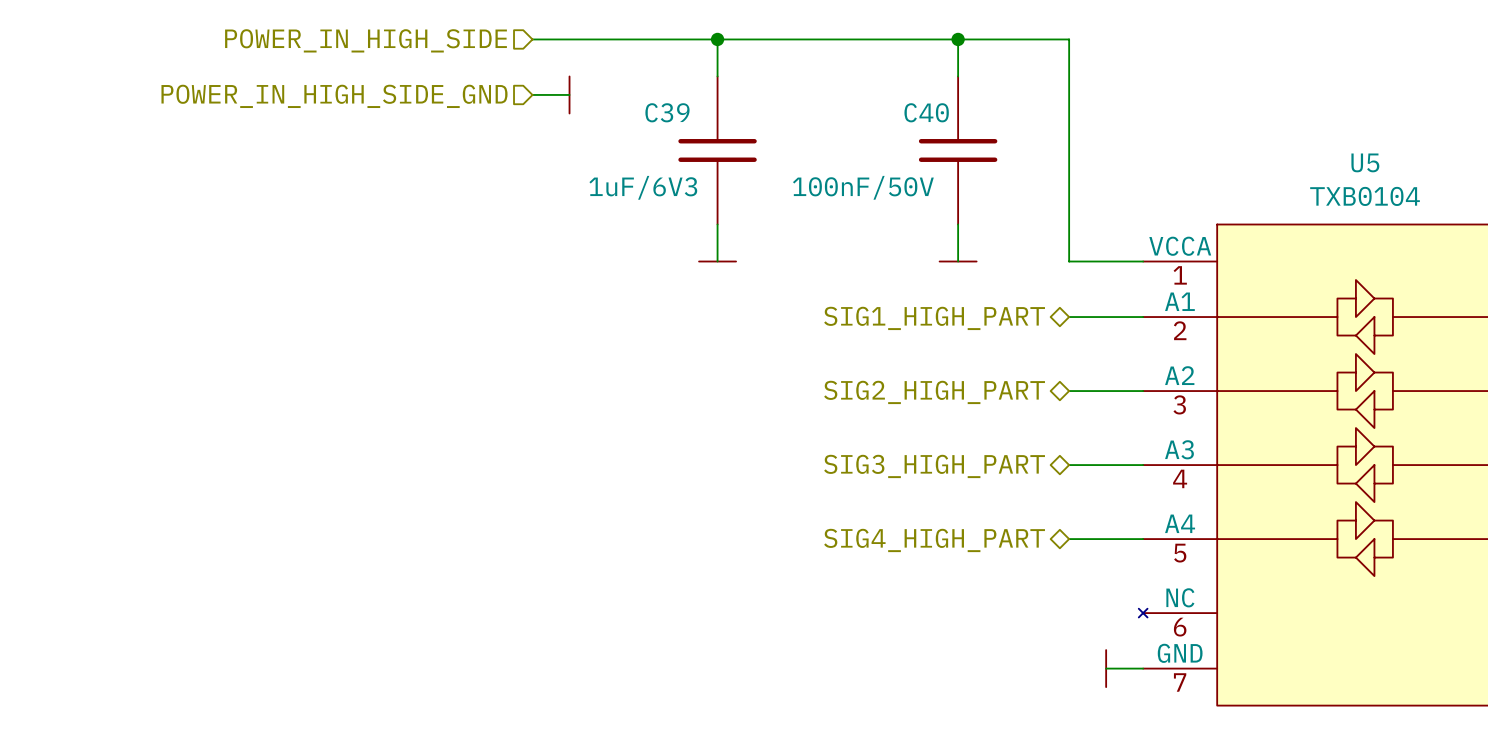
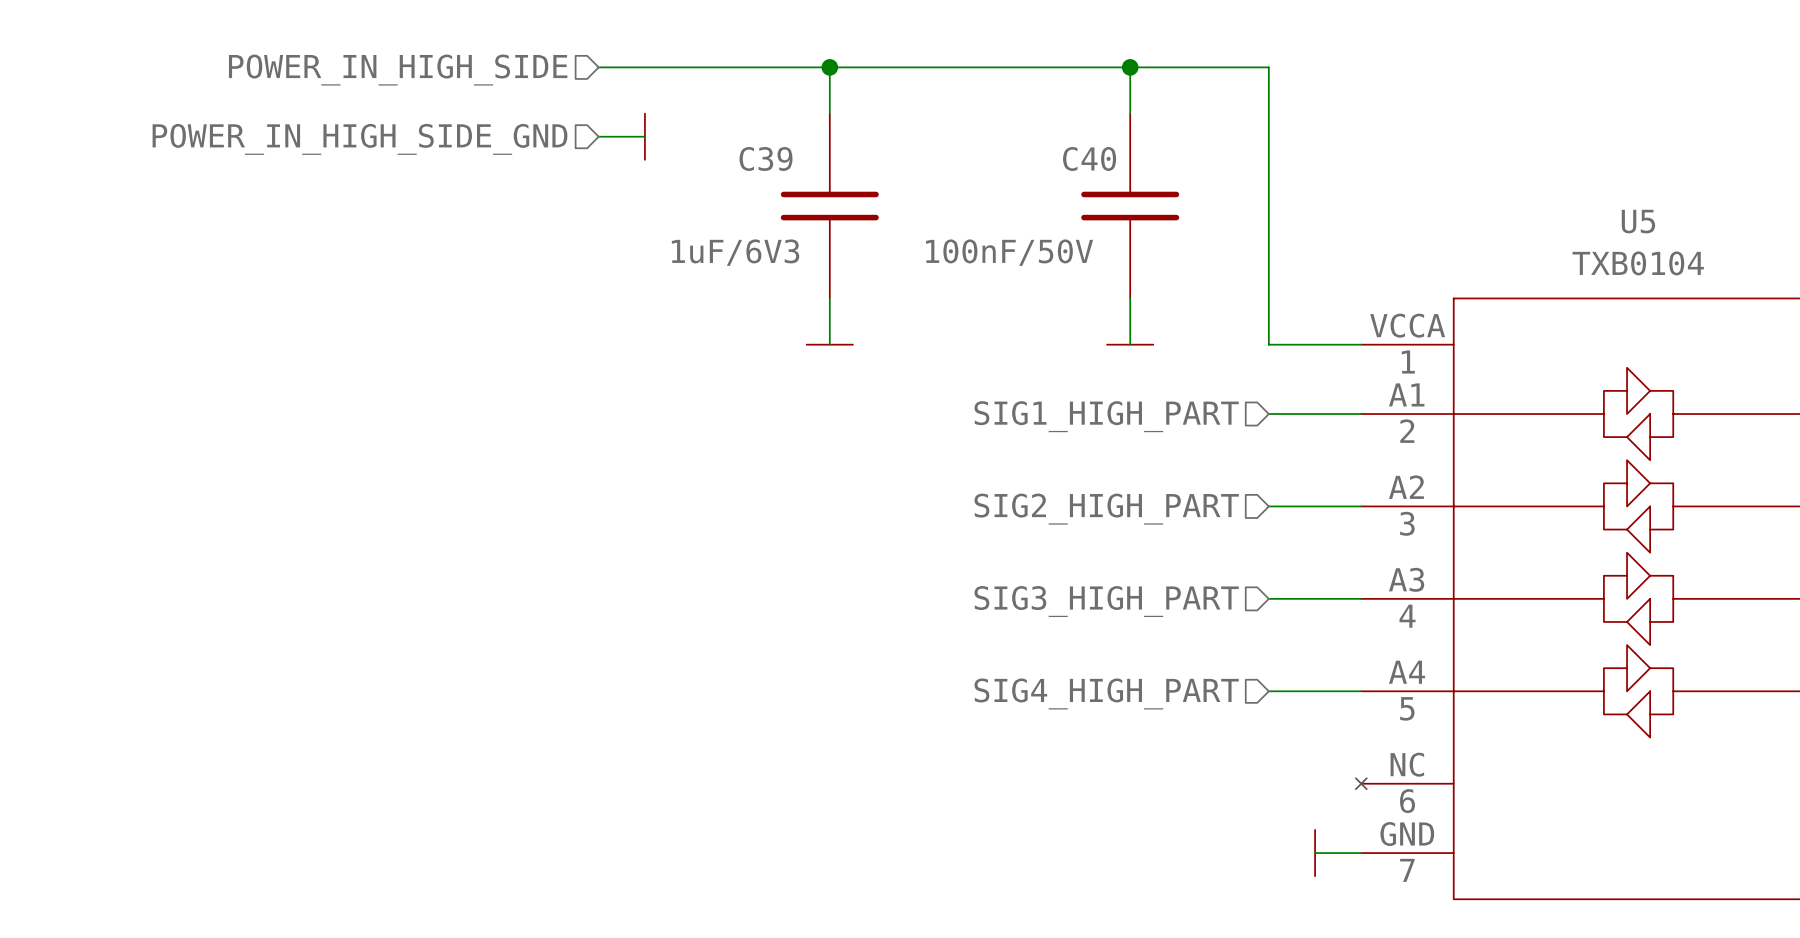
hierarchical label shape: bidirectional (934, 318) -> input (1106, 416)
hierarchical label shape: bidirectional (934, 392) -> input (1106, 509)
hierarchical label shape: bidirectional (934, 466) -> input (1106, 601)
hierarchical label shape: bidirectional (934, 540) -> input (1106, 693)

